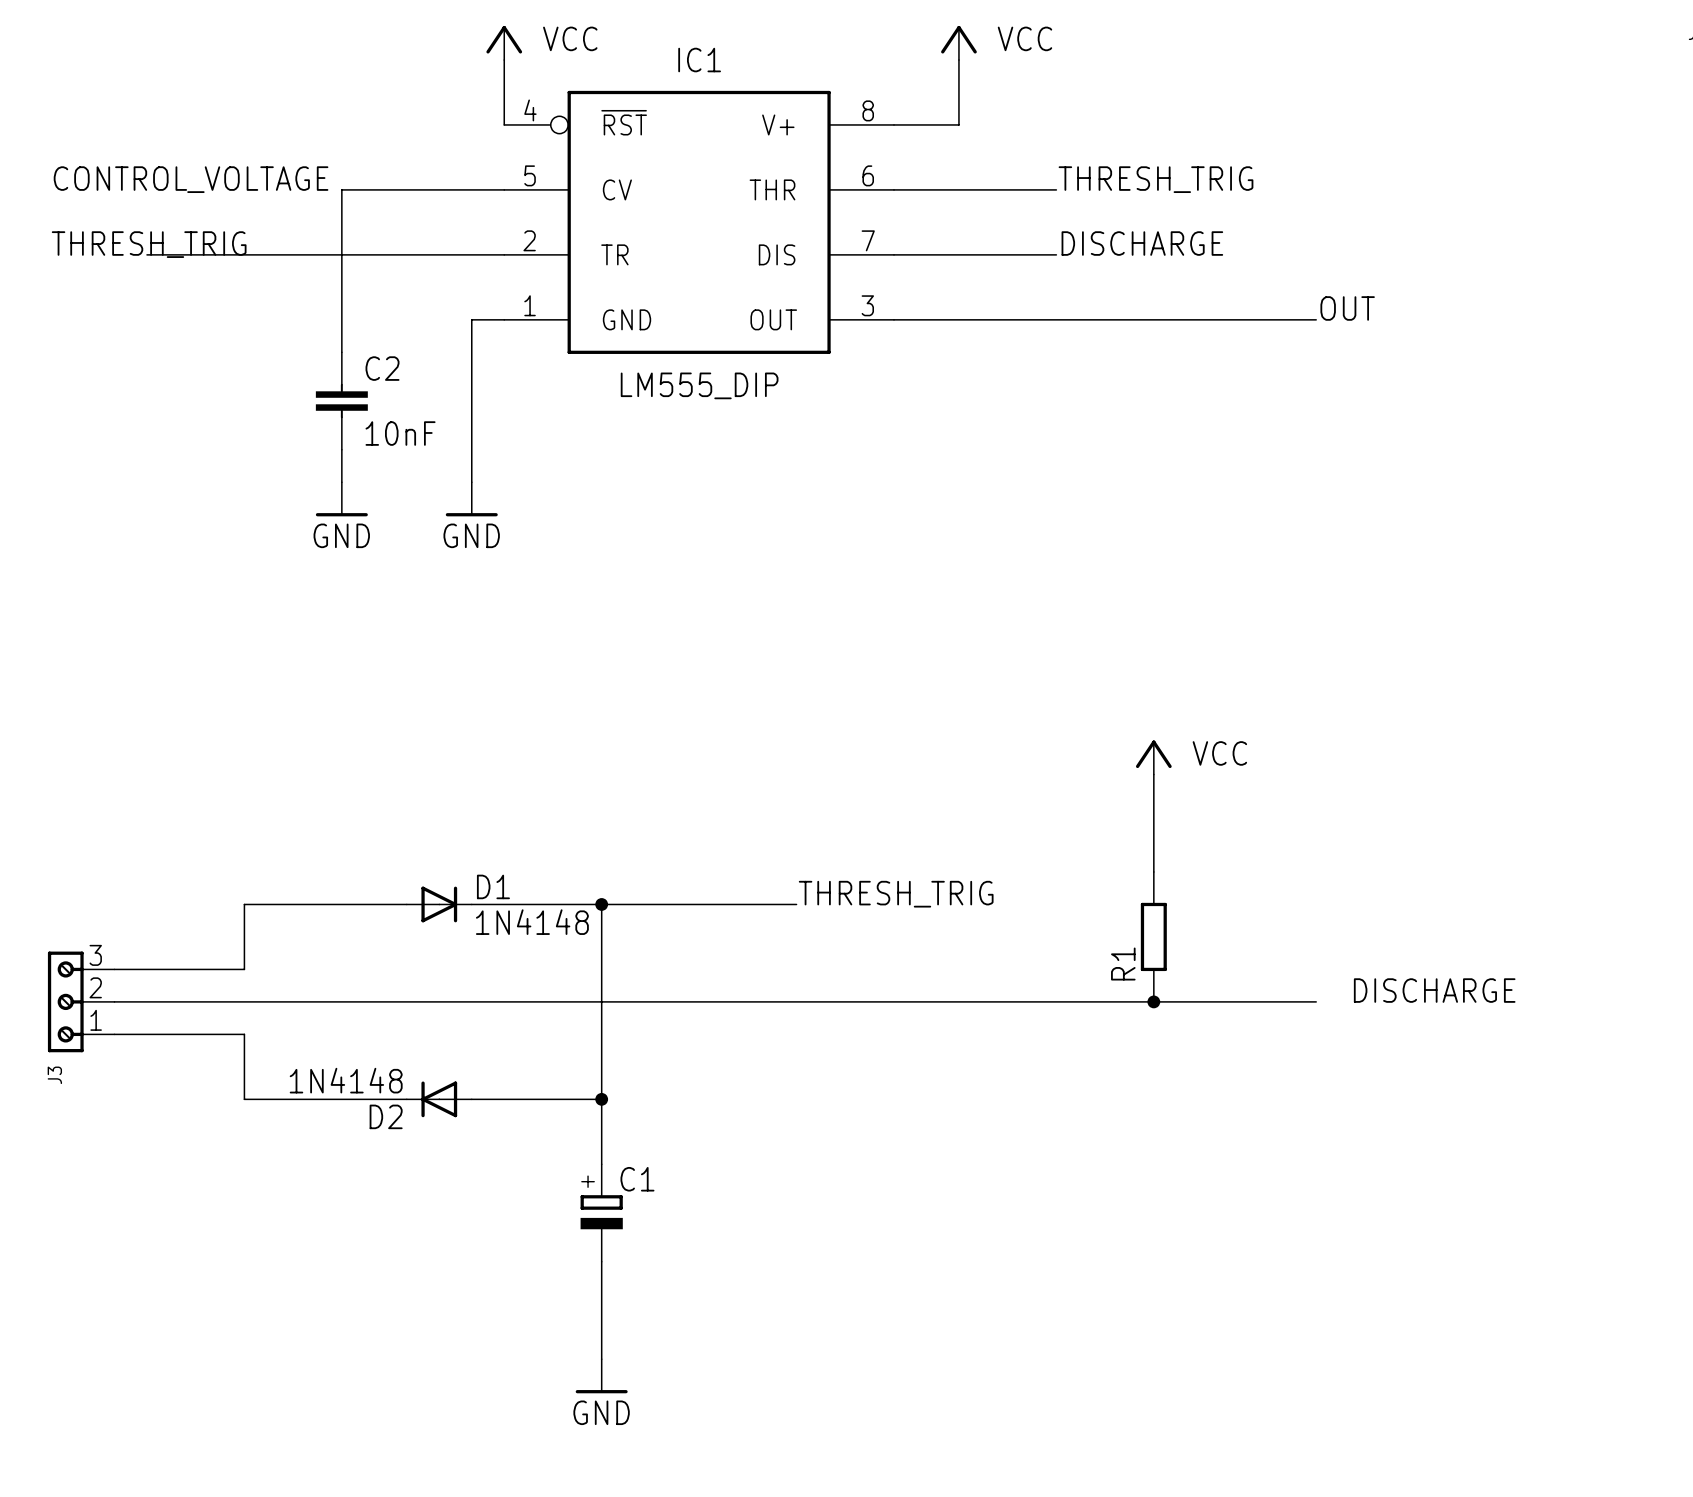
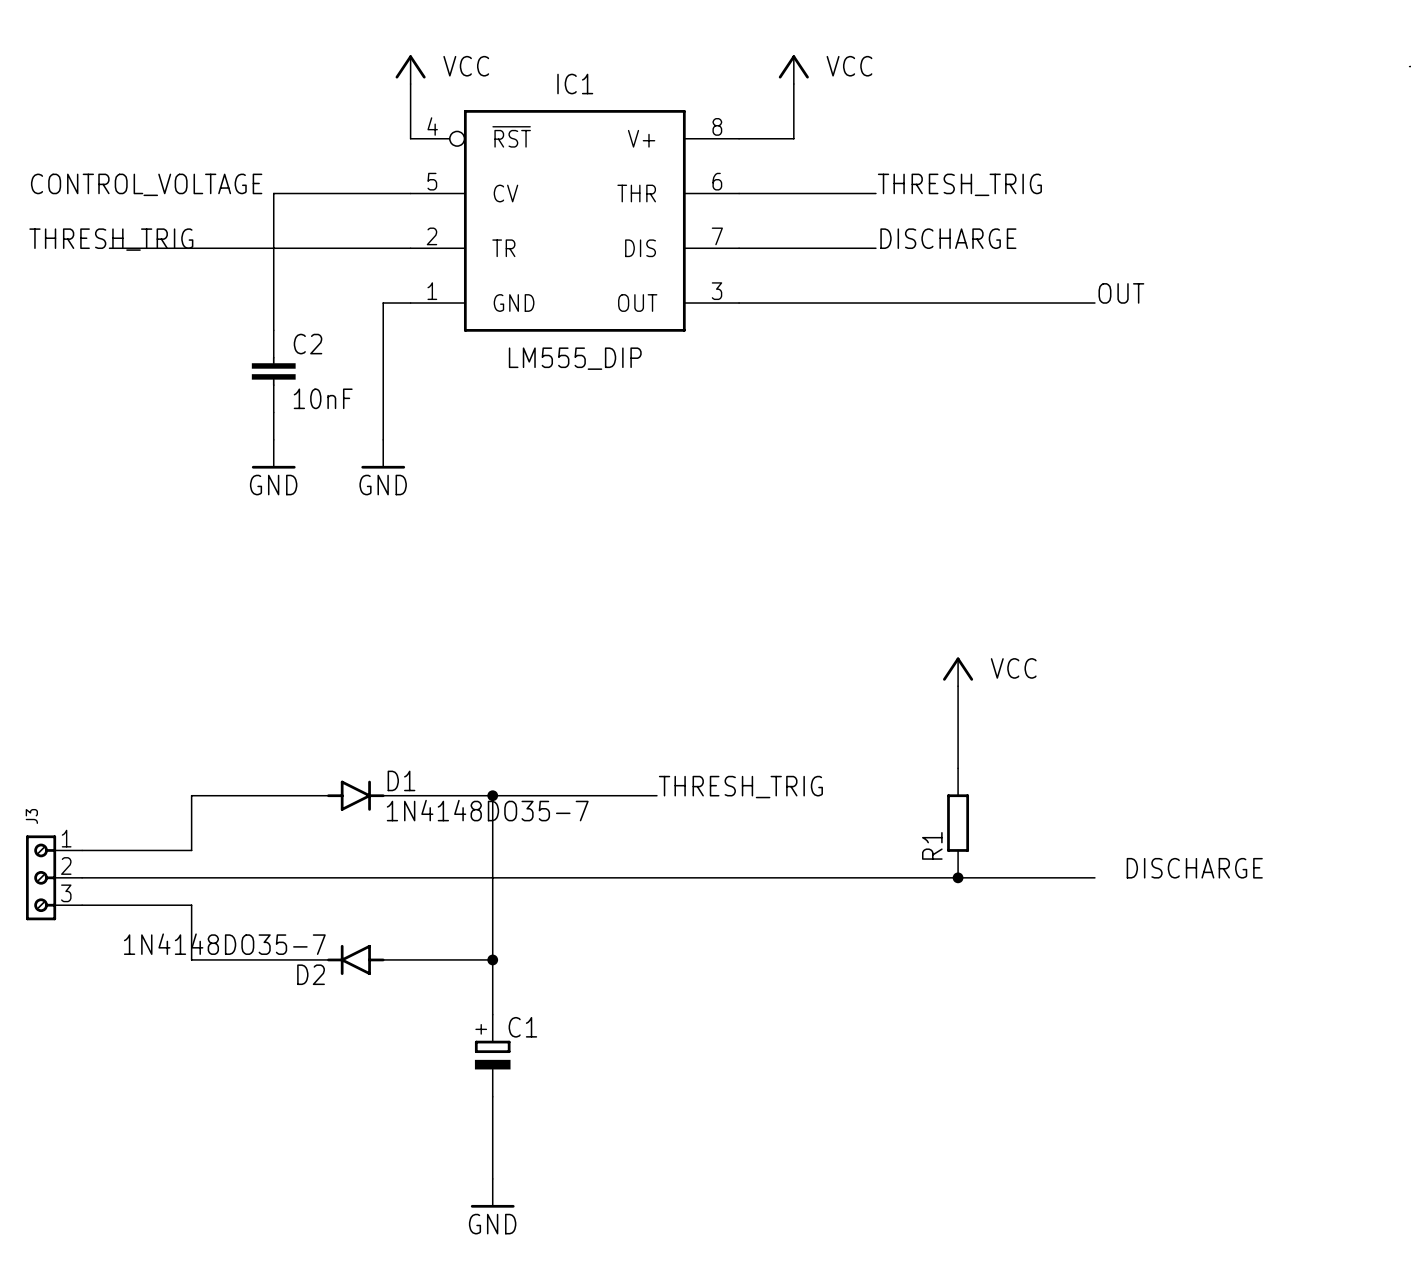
D1 symbol: [406, 886, 472, 923] -> [327, 780, 385, 811]
D1 value: 1N4148 (532, 922) -> 1N4148DO35-7 (487, 810)
J3 flip: as is (65, 1001) -> up-down (41, 877)
D2 value: 1N4148 (346, 1080) -> 1N4148DO35-7 (224, 944)
D2 symbol: [406, 1081, 472, 1118] -> [327, 944, 385, 976]

